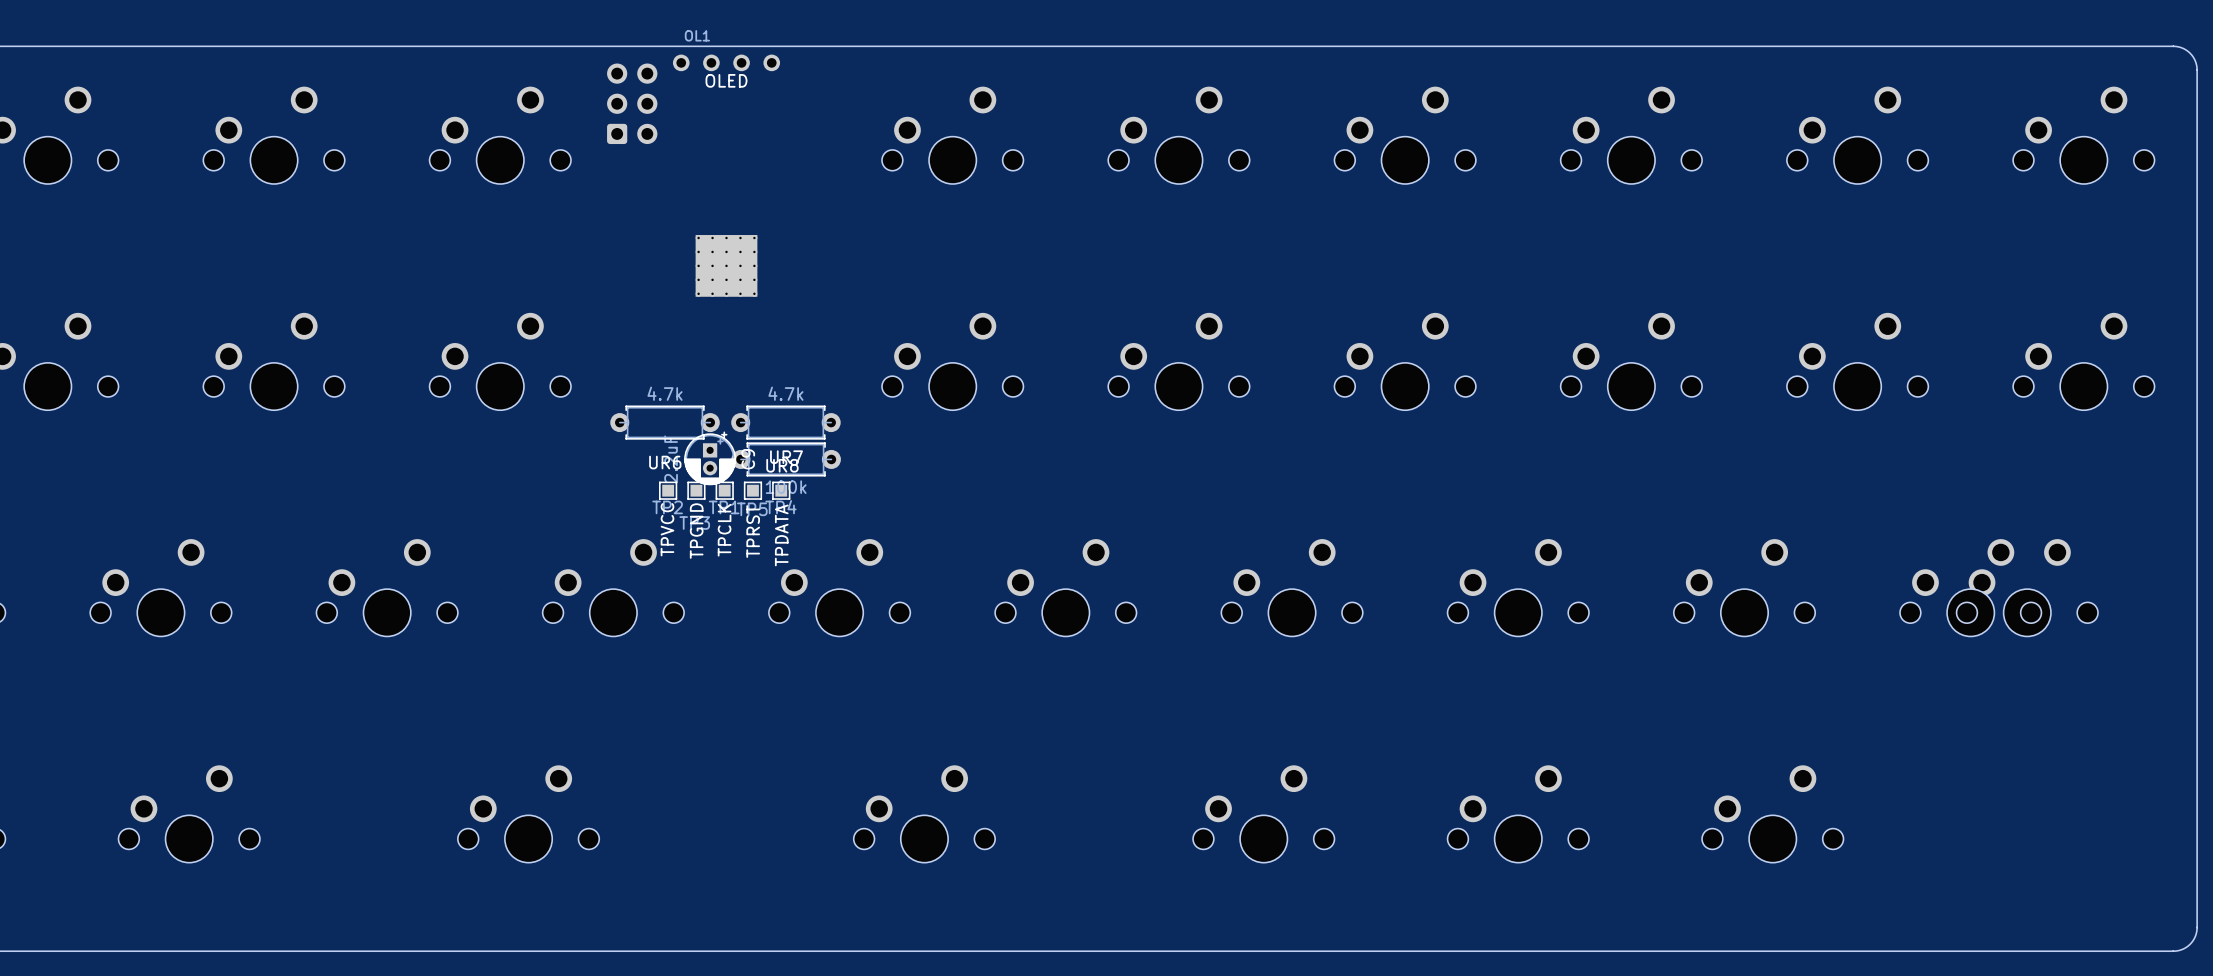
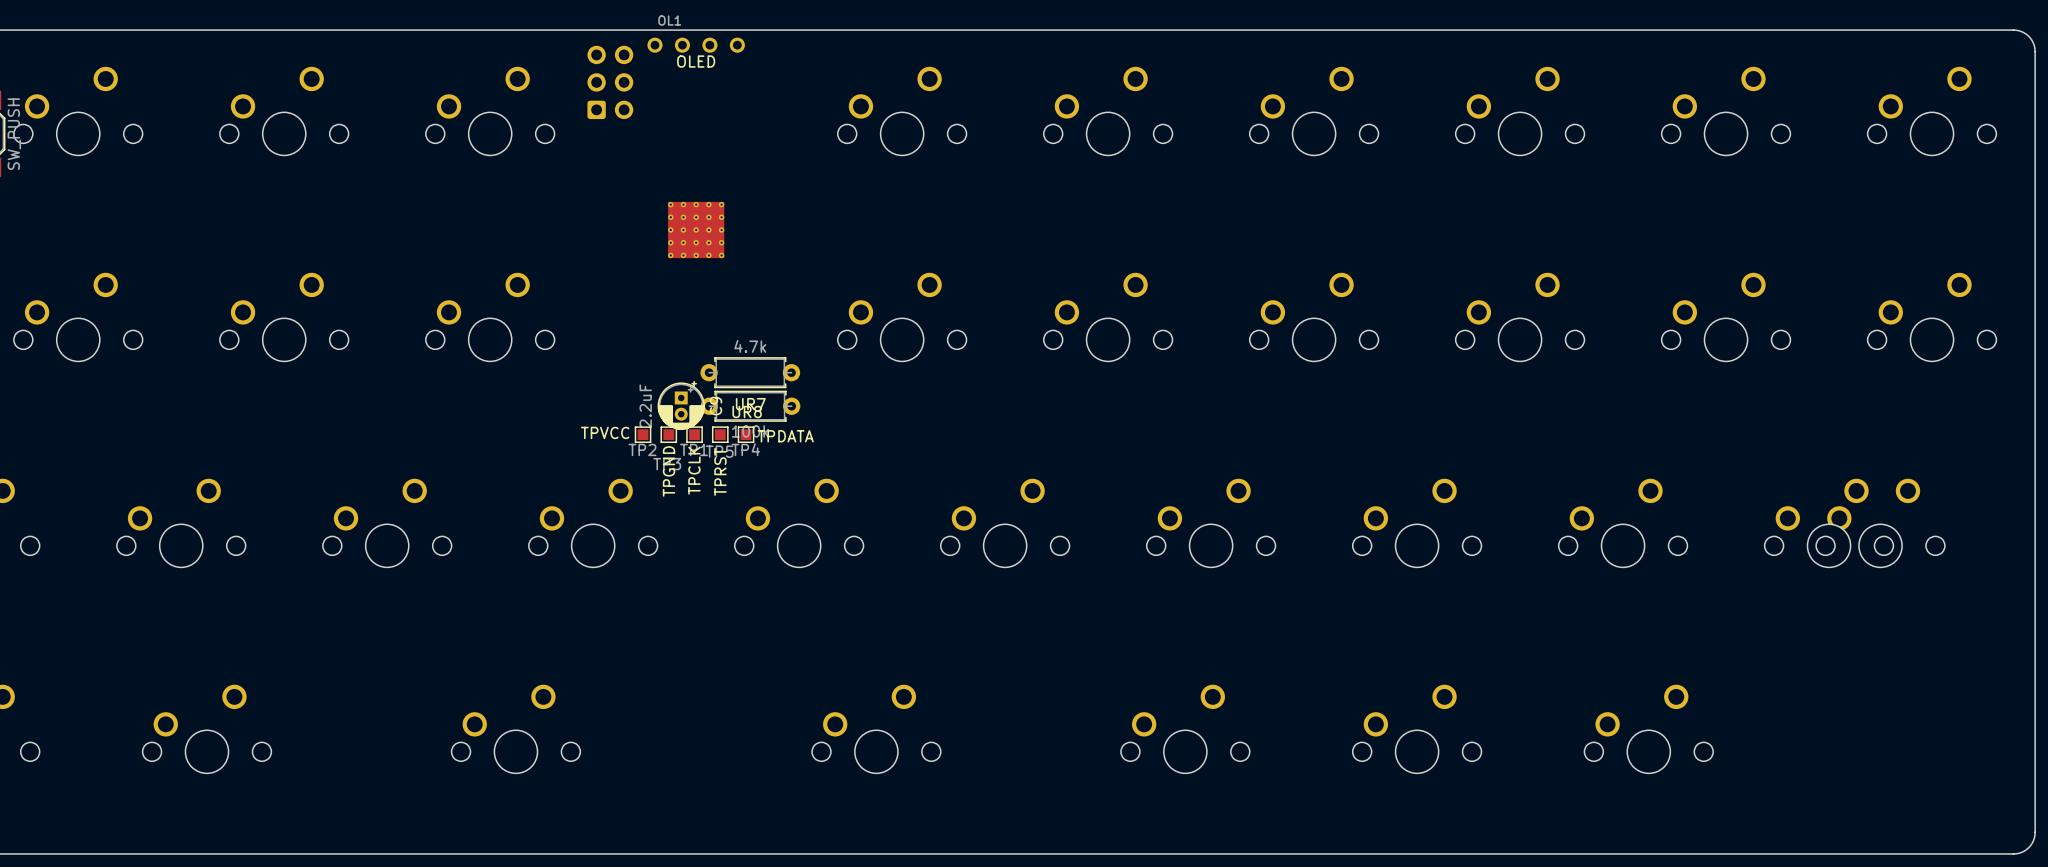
UR6: 4.7k (665, 422) -> none
TP2 value rotation: 0° (667, 529) -> 90° clockwise (605, 432)
TP4 value rotation: 0° (781, 535) -> 90° clockwise (785, 436)

